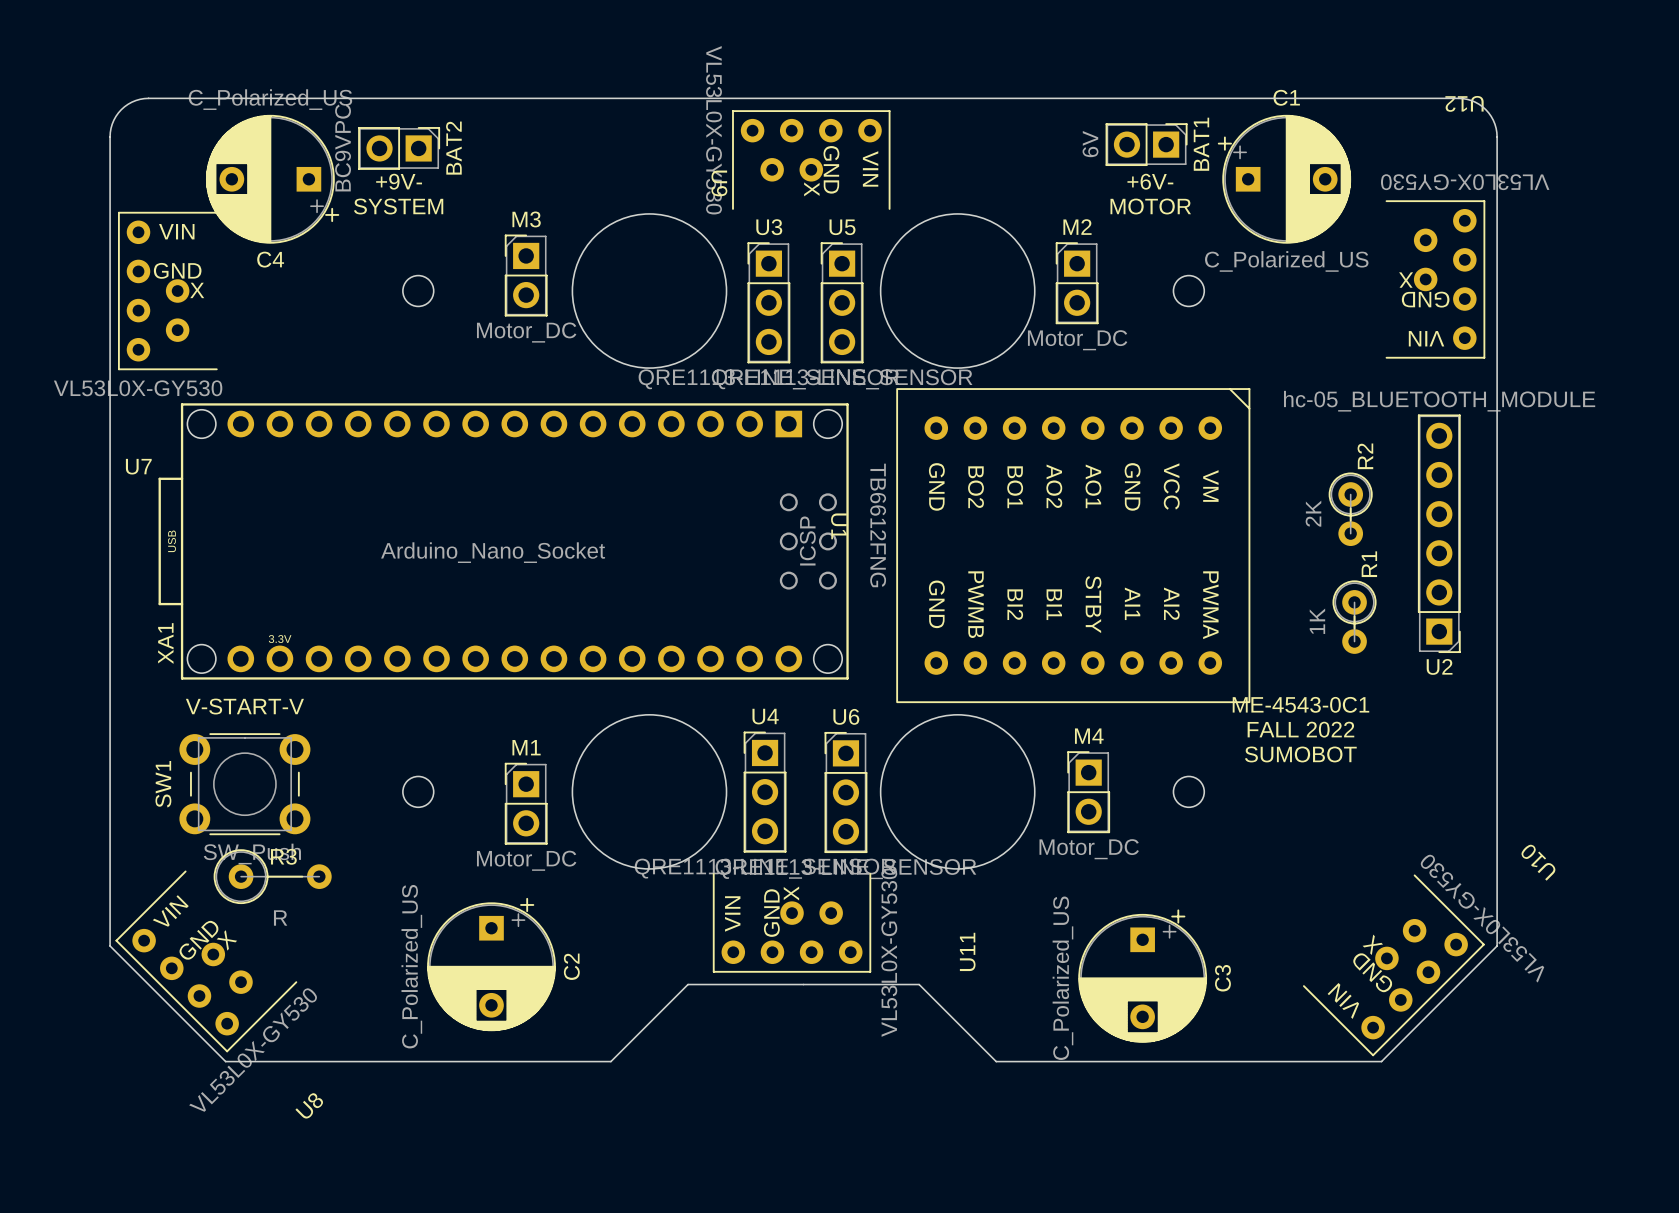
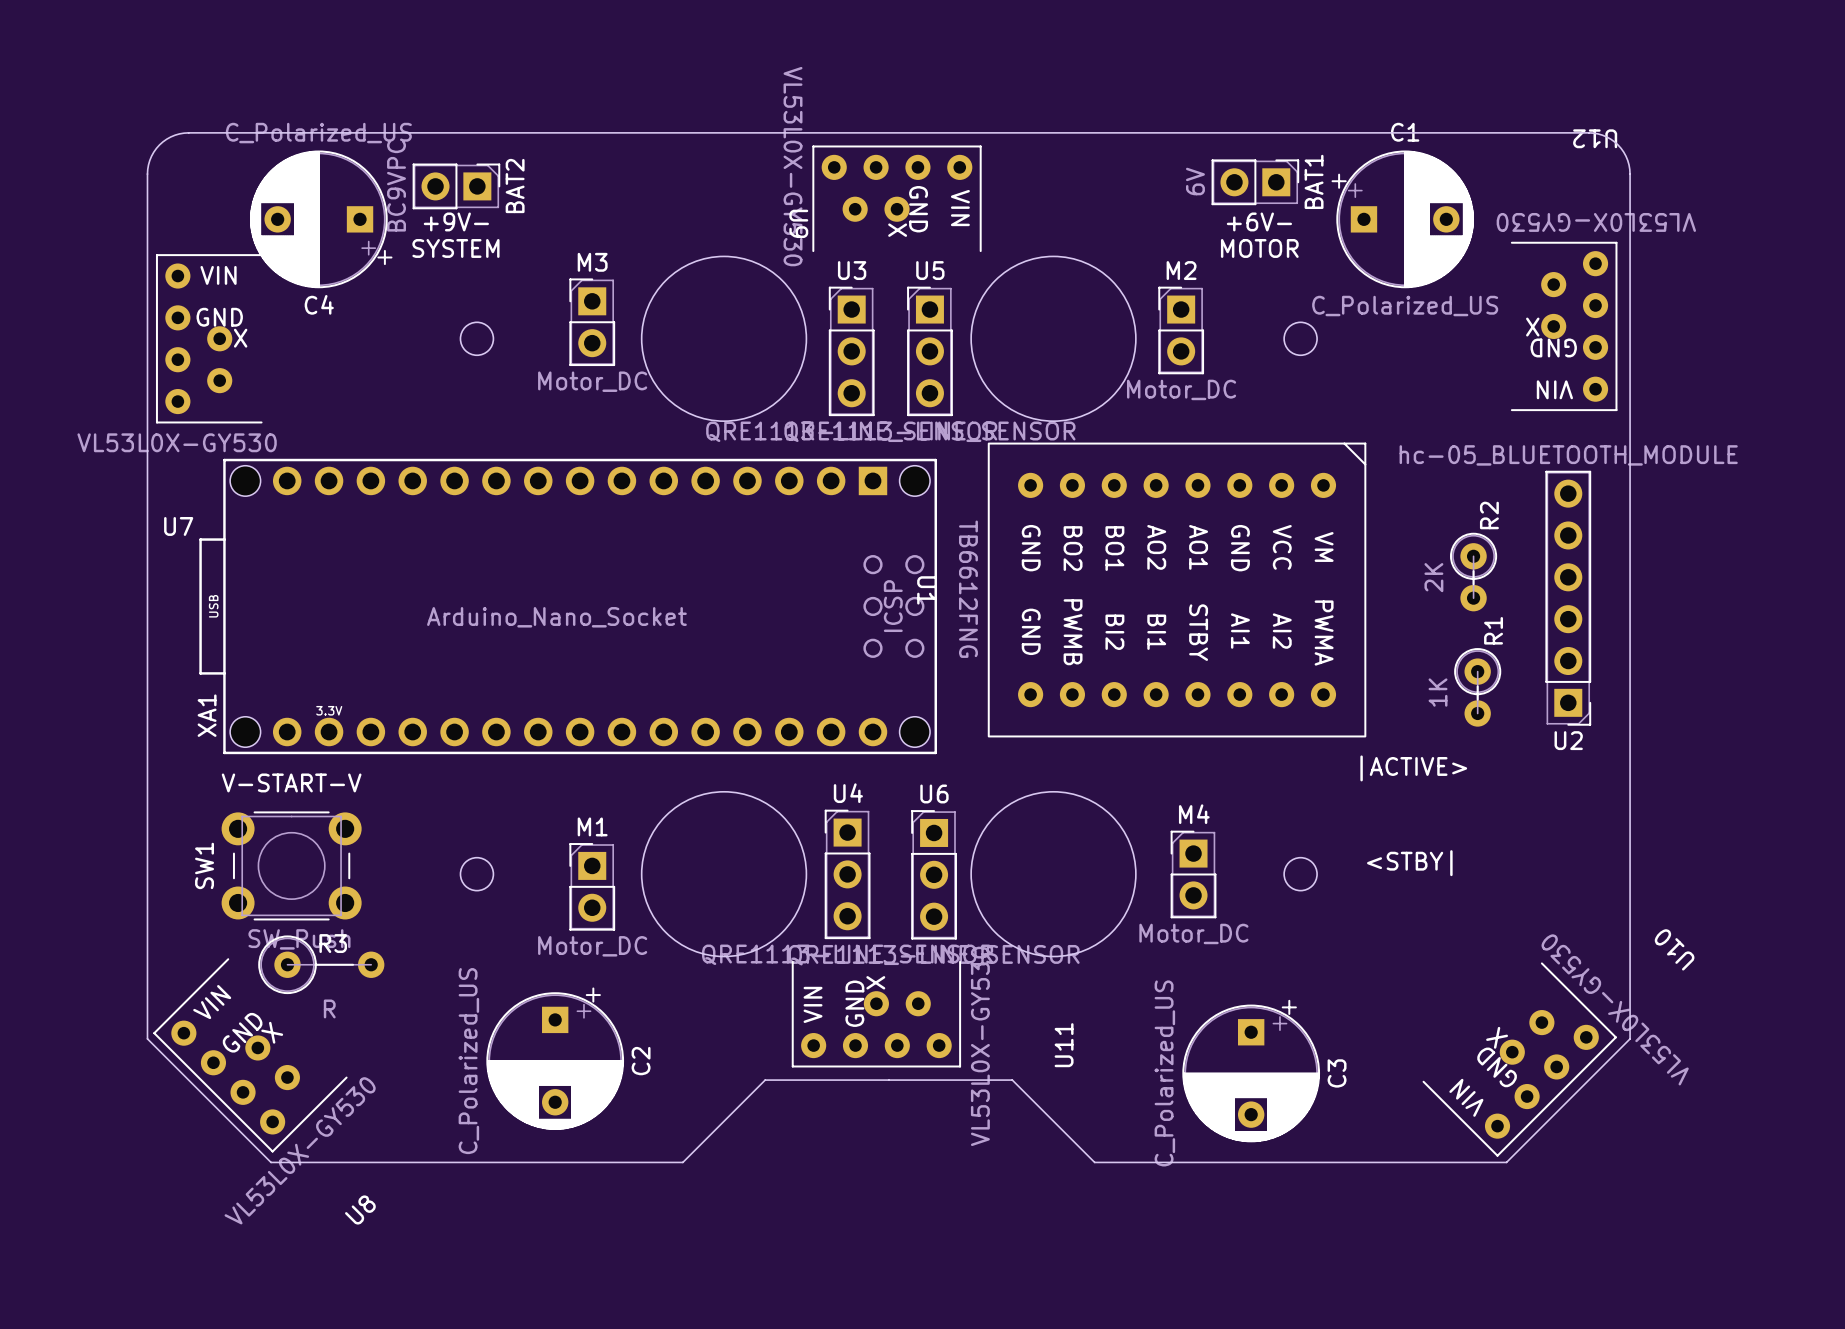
U1 footprint: [896, 388, 1251, 704] -> [987, 442, 1367, 738]
text: none -> |ACTIVE> (1413, 768)
text: ME-4543-0C1 (1300, 704) -> none
text: FALL 2022 (1300, 729) -> none
text: SUMOBOT (1300, 754) -> none
text: none -> <STBY| (1409, 863)

